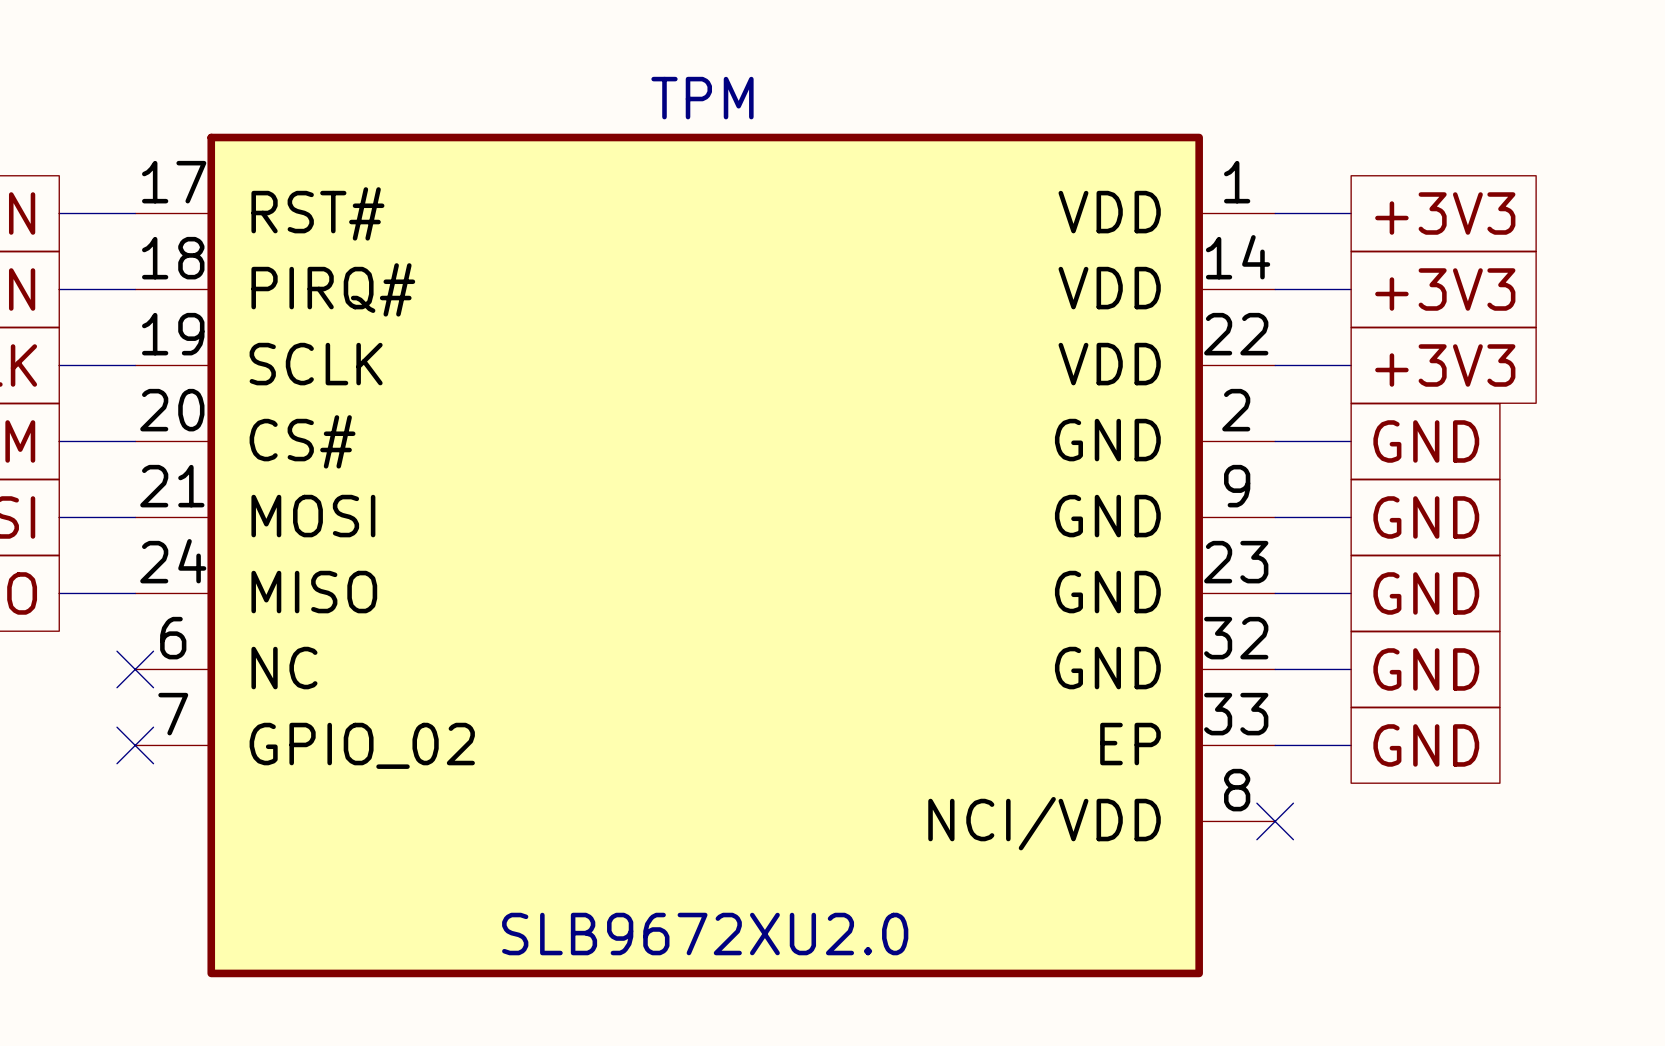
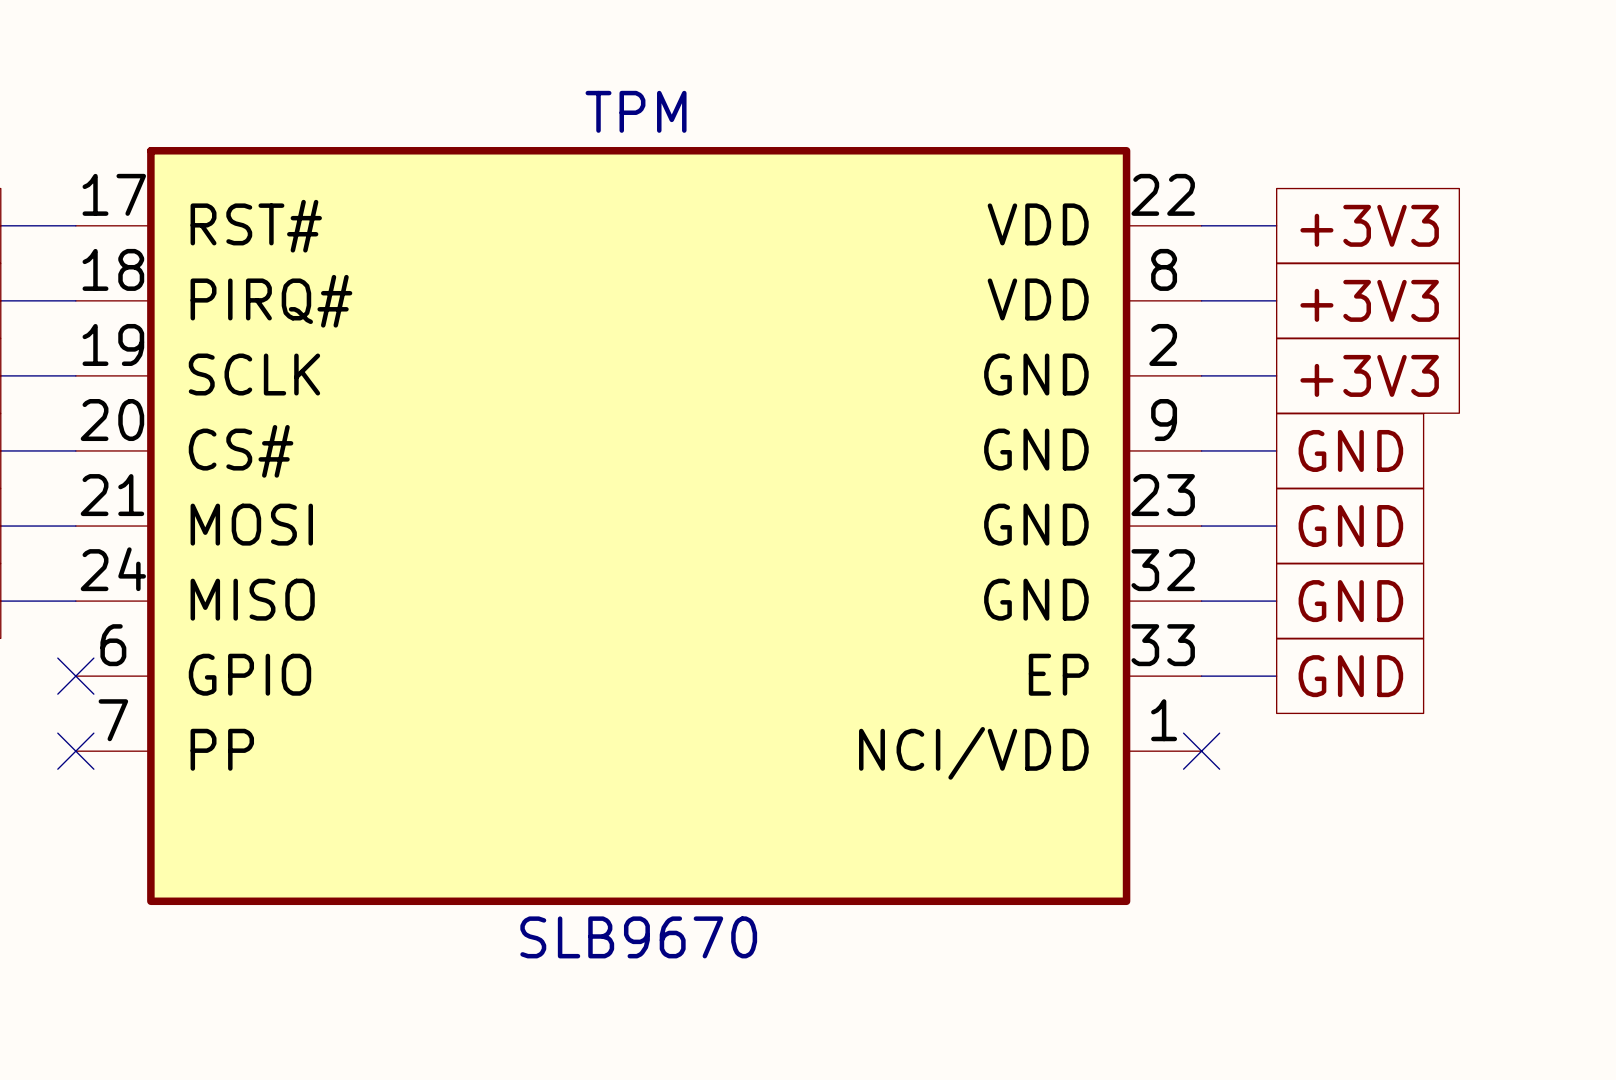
TPM: none -> SLB9670 (638, 526)
TPM: SLB9672XU2.0 (705, 555) -> none
wire: (1275, 745) (1351, 745) -> none
global label: GND (1426, 745) -> none
no-connect mark position: (1275, 821) -> (1201, 751)

